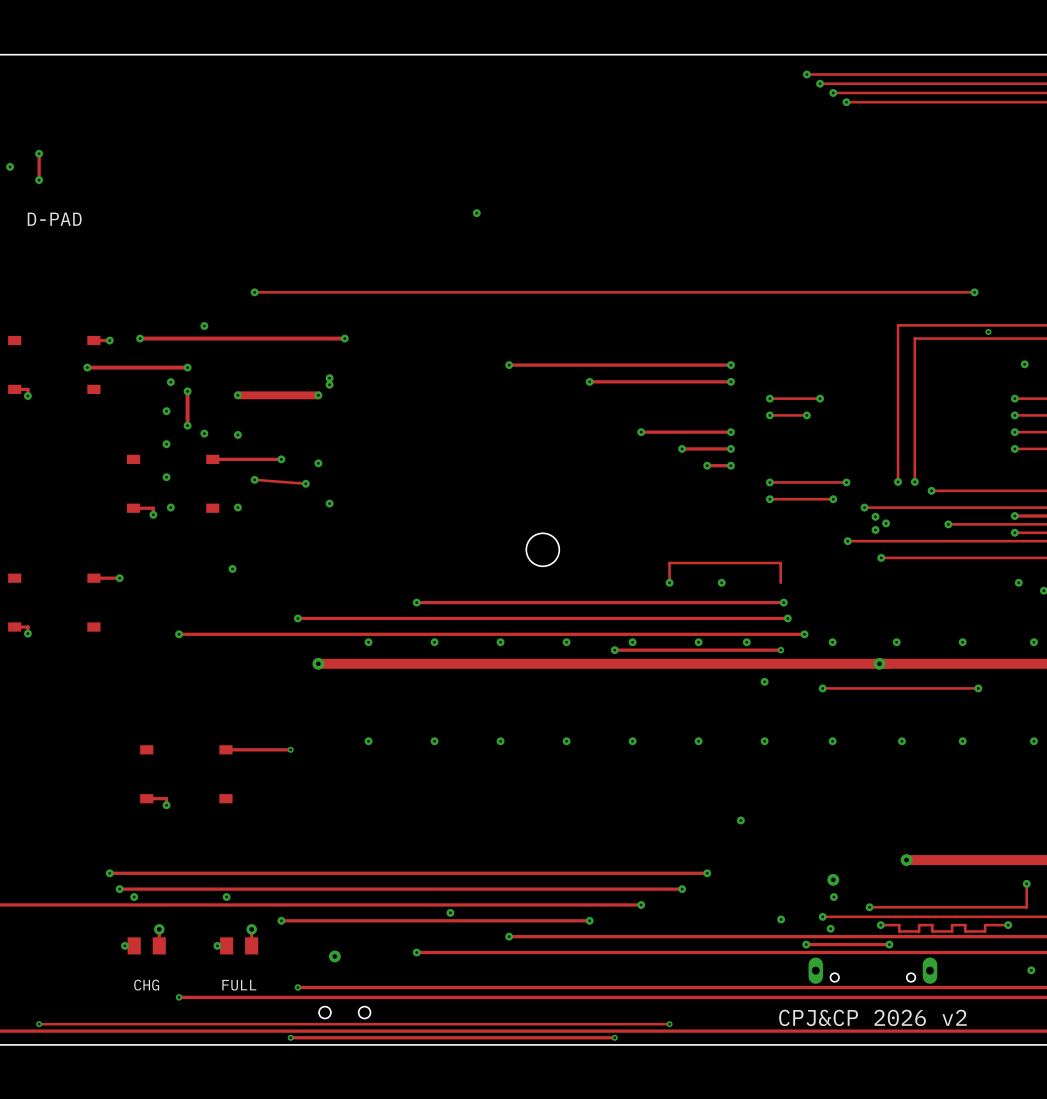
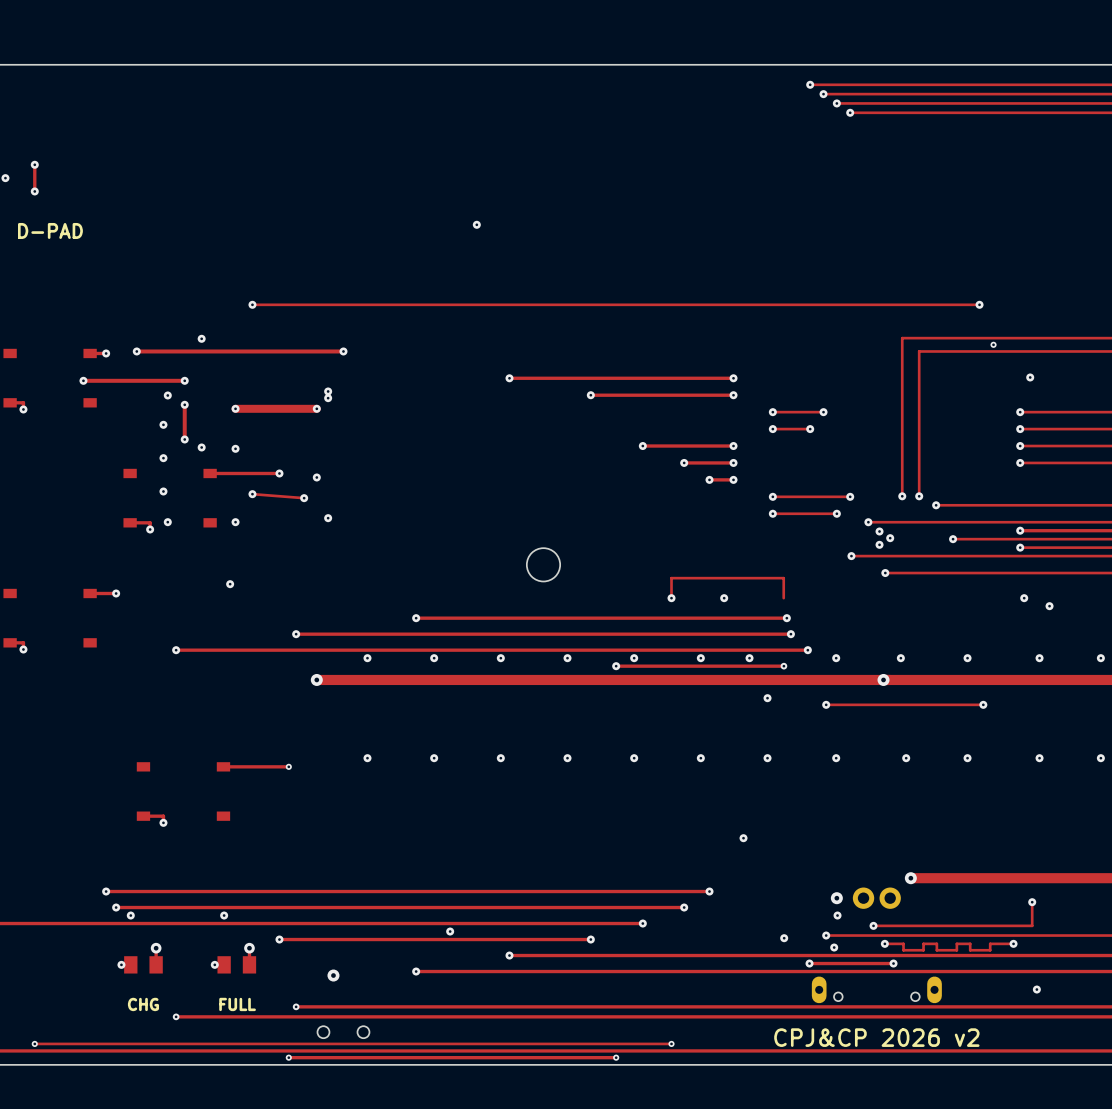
part: none -> (876, 898)

